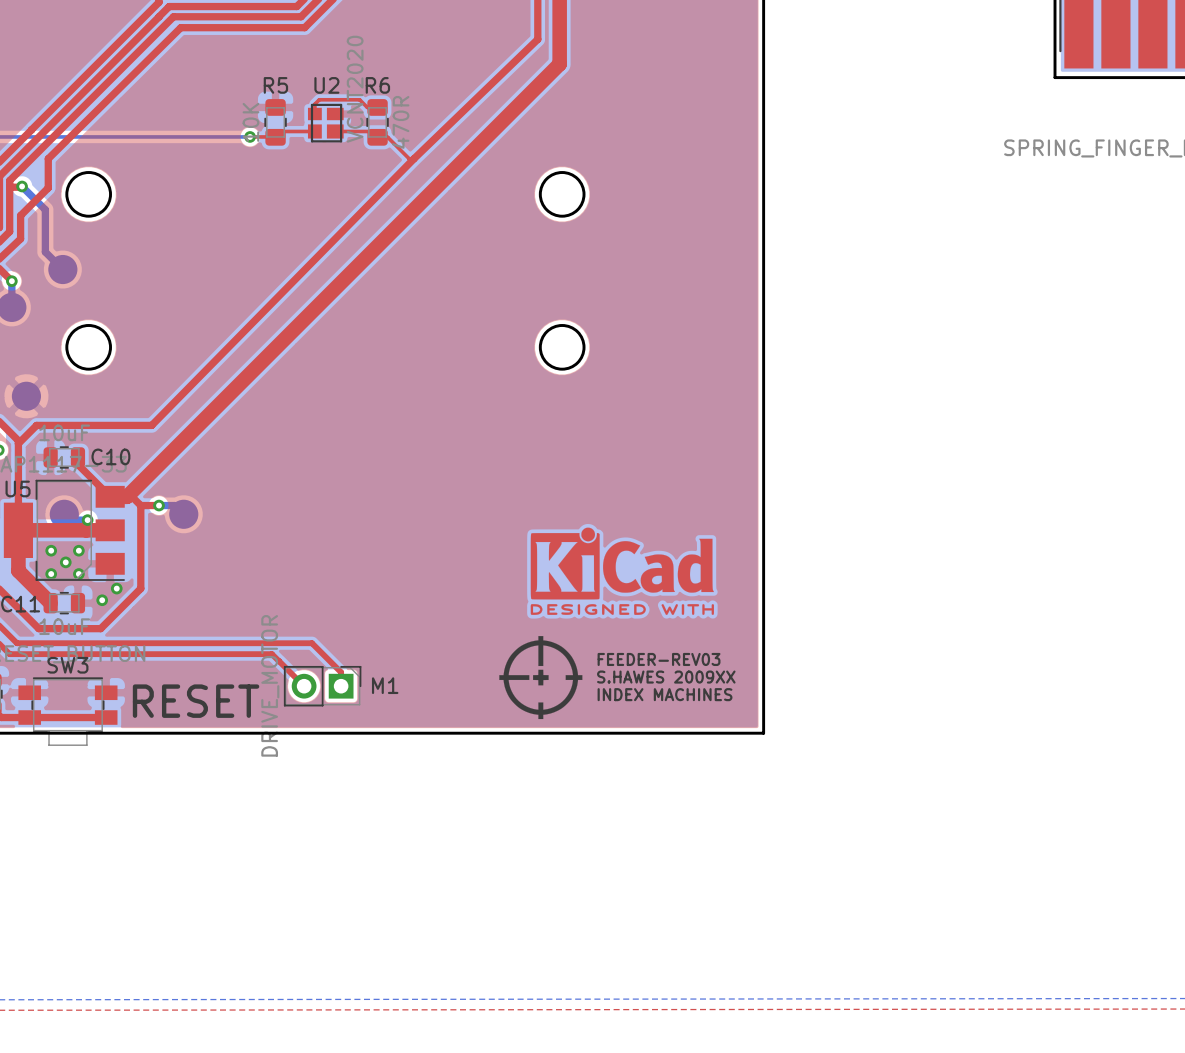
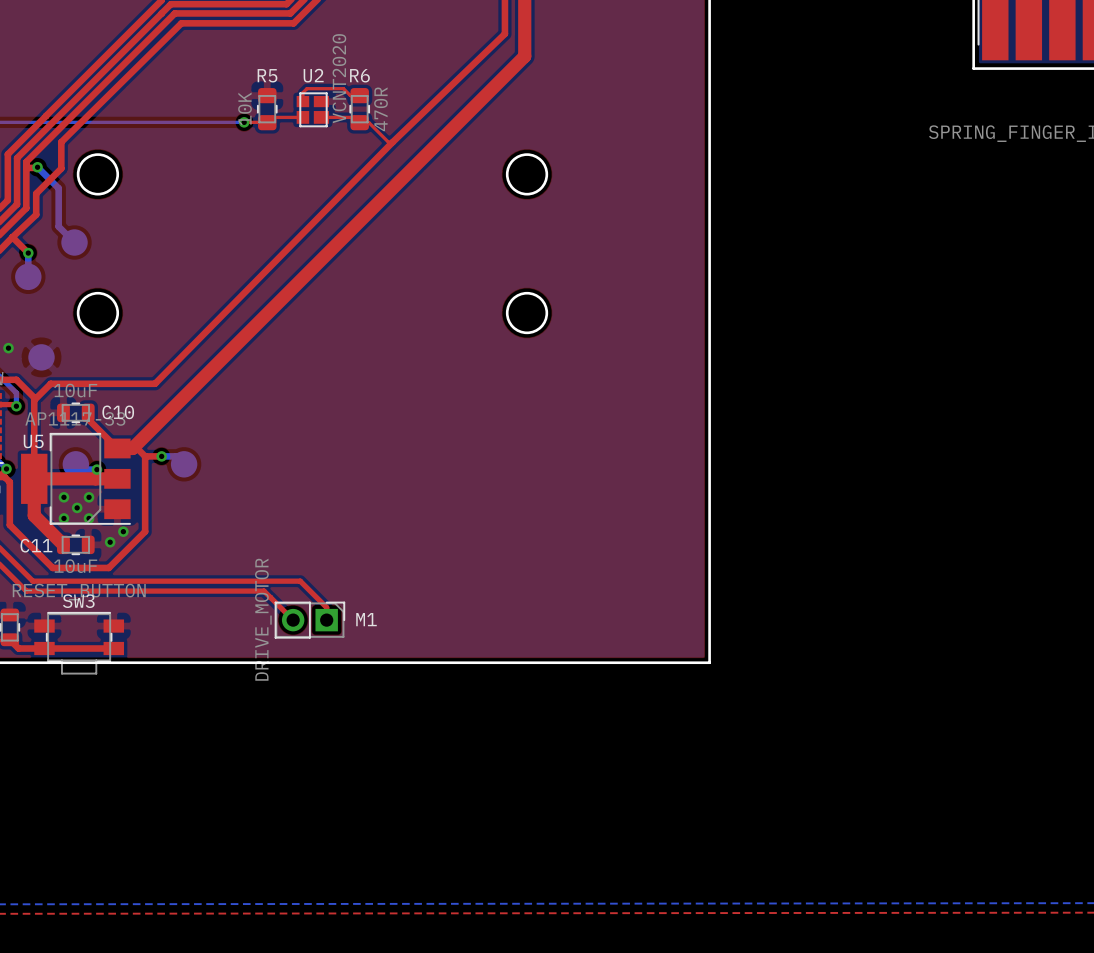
drawing: [530, 527, 714, 615] -> none
drawing: [499, 636, 583, 720] -> none
text: FEEDER-REV03 (659, 659) -> none
text: S.HAWES 2009XX (666, 677) -> none
text: INDEX MACHINES (665, 694) -> none
text: RESET (196, 701) -> none

